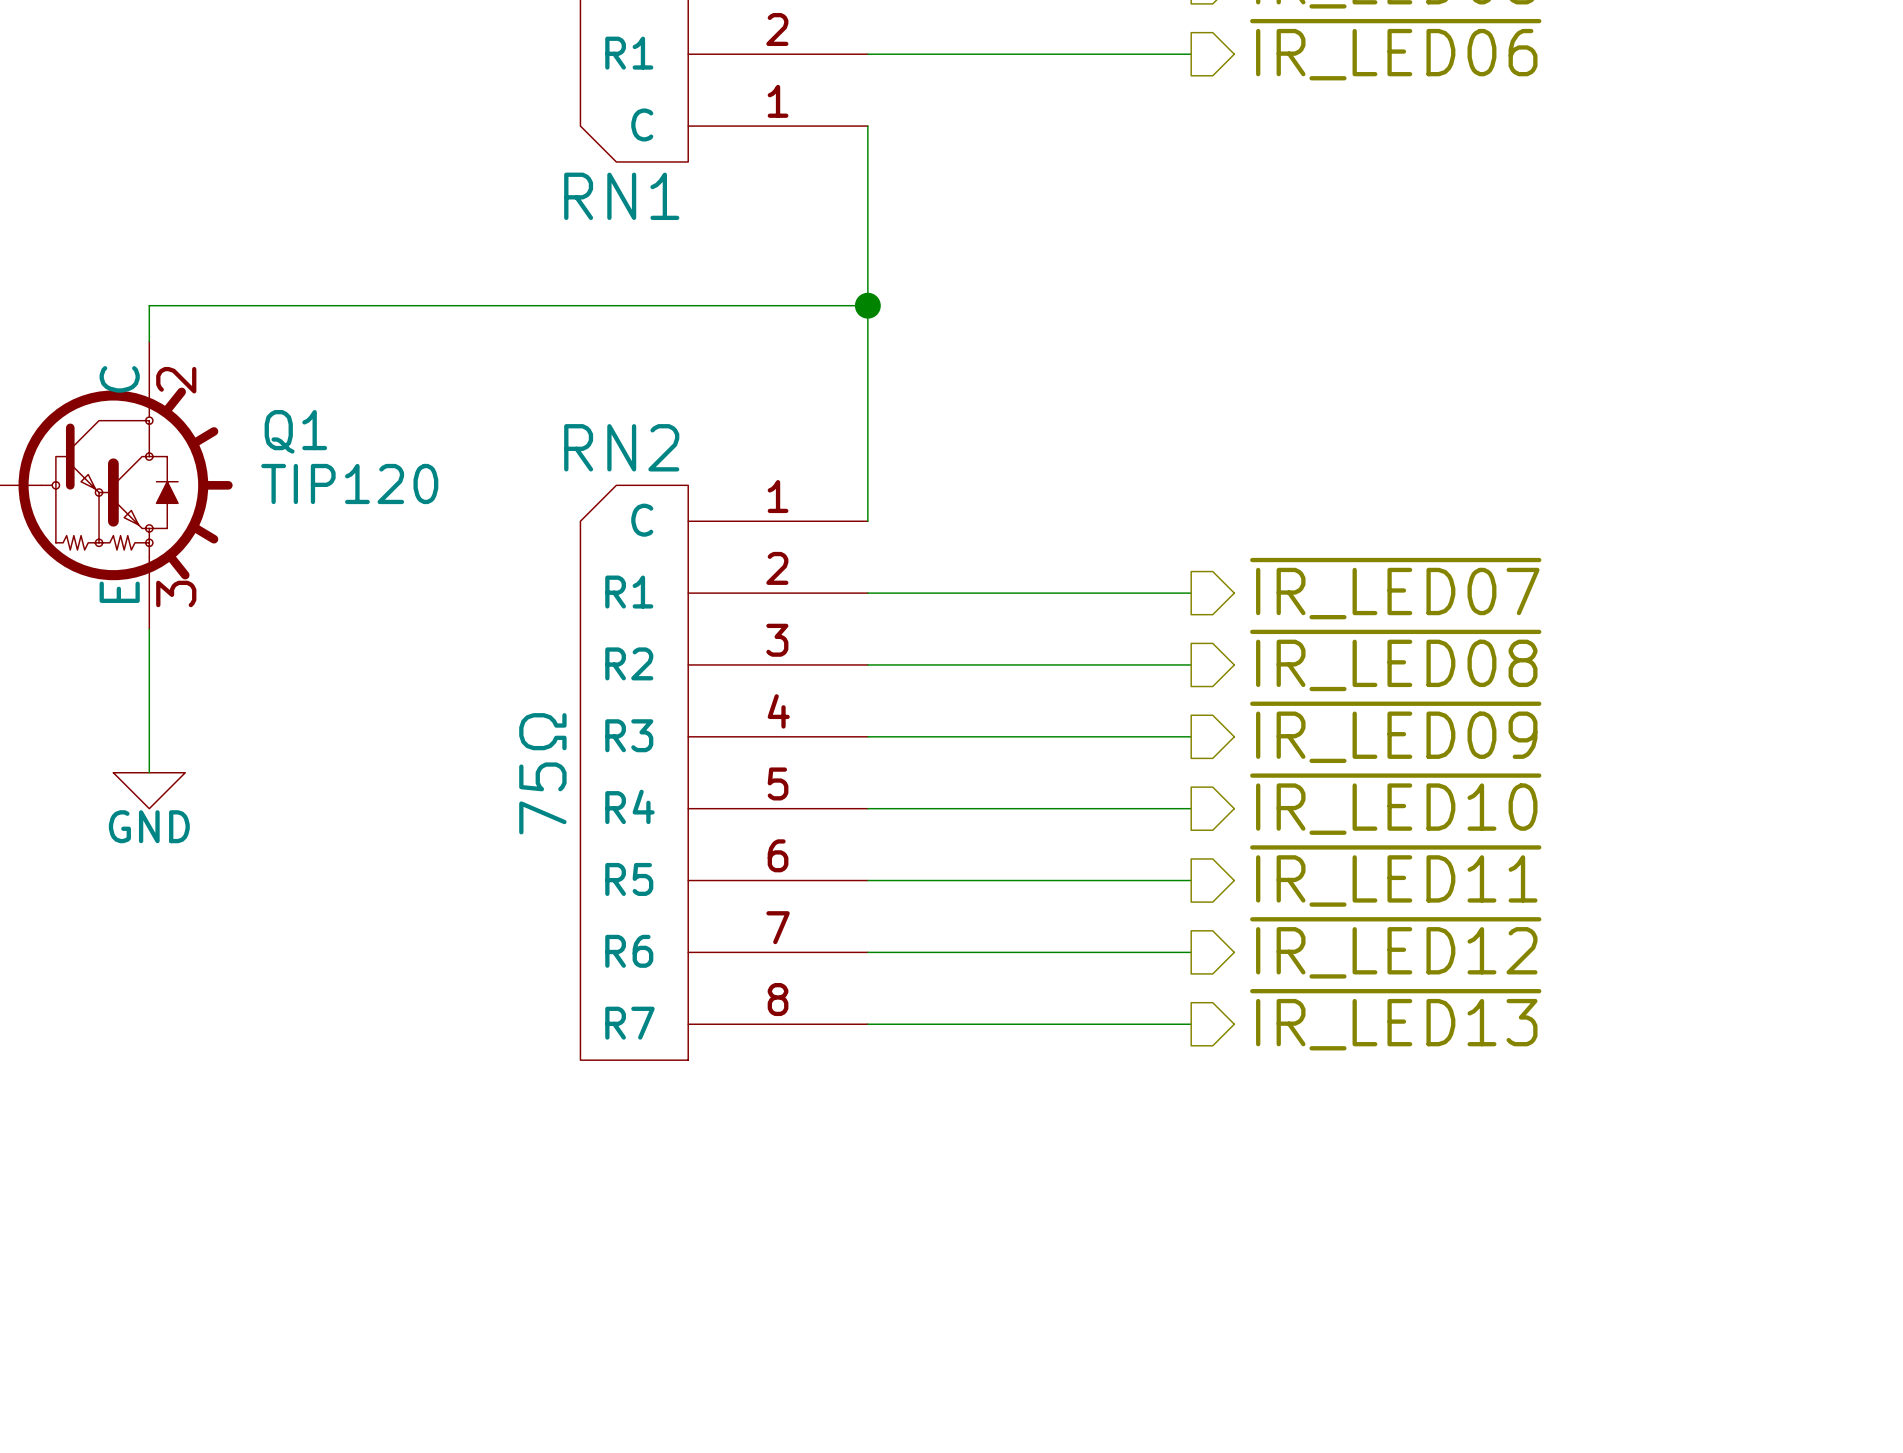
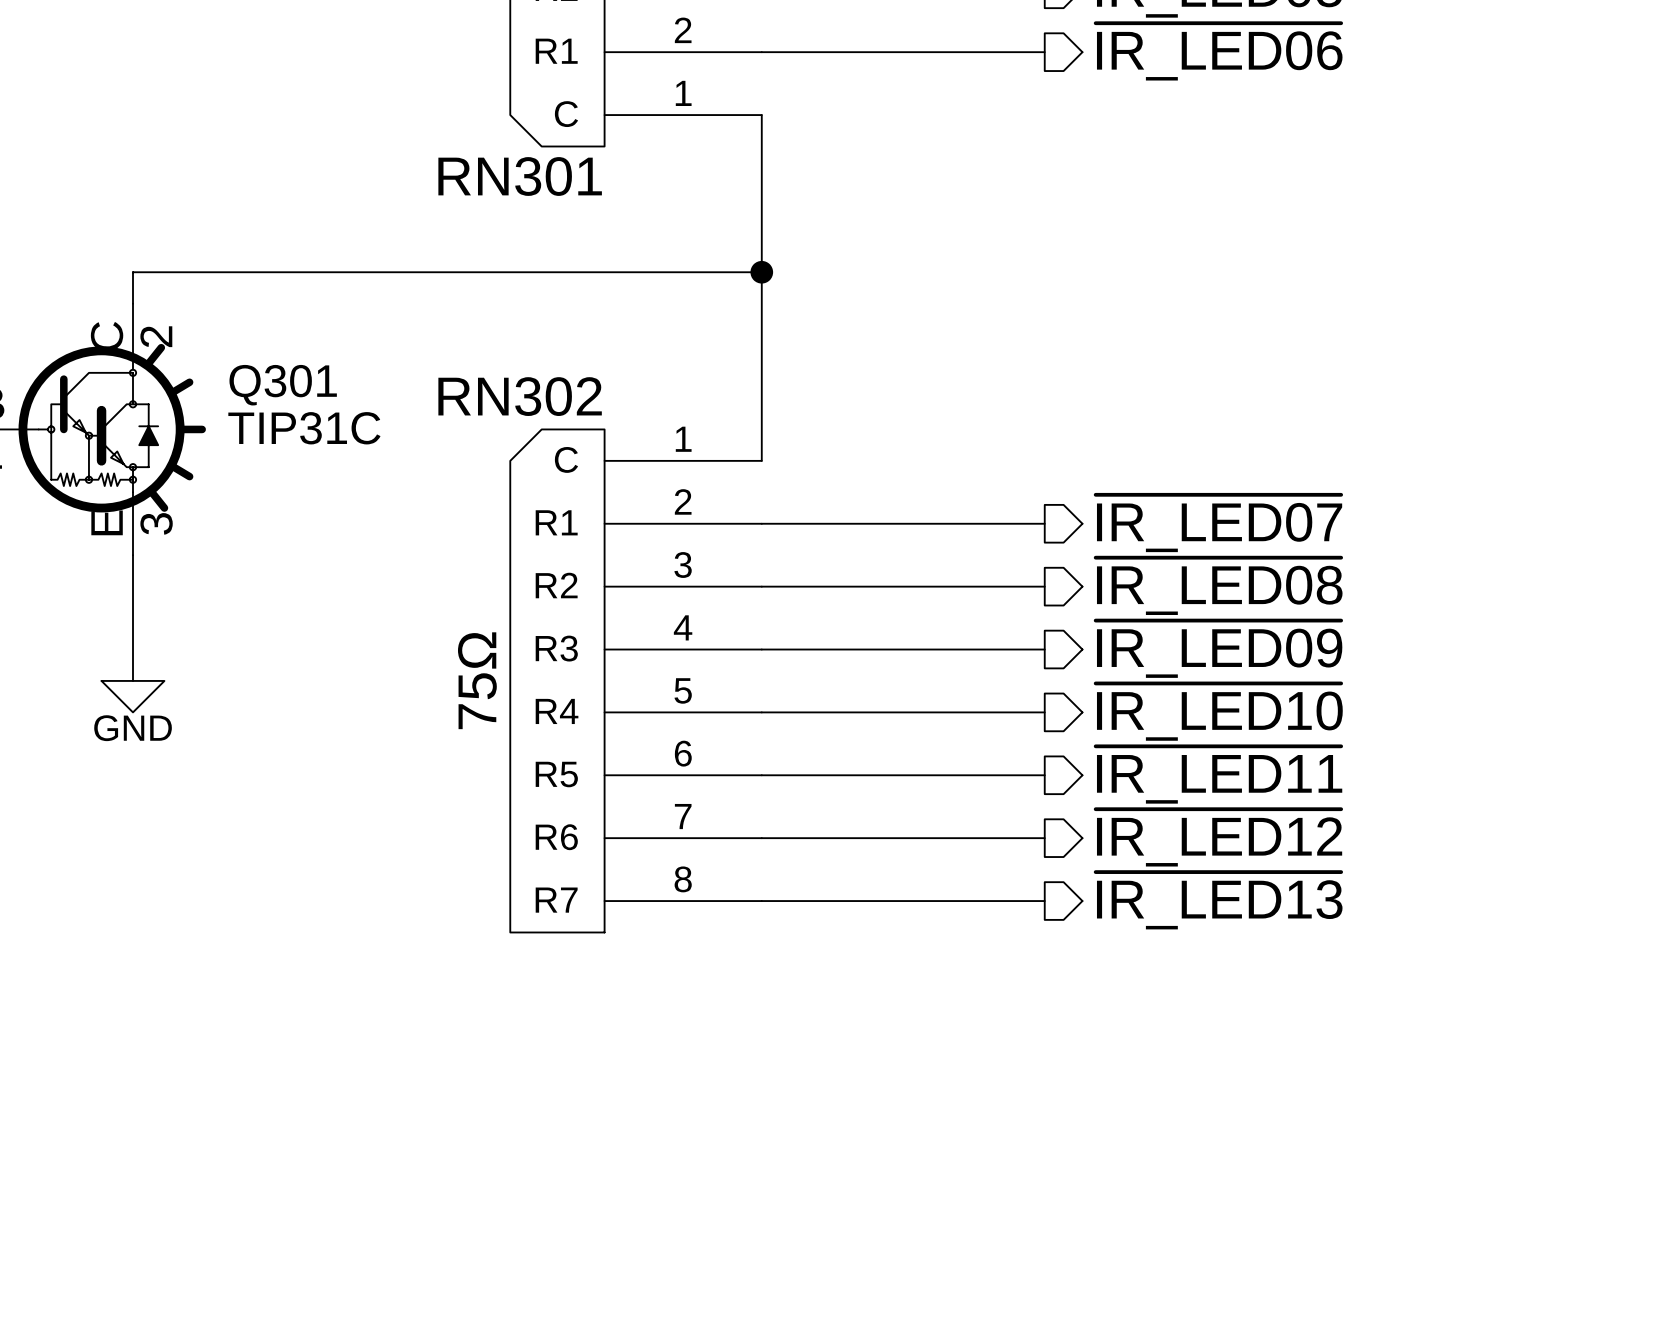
RN1 name: RN1 (621, 196) -> RN301 (520, 176)
Q1 name: Q1 (295, 431) -> Q301 (283, 385)
RN2 name: RN2 (621, 447) -> RN302 (520, 396)
Q1 value: TIP120 (349, 483) -> TIP31C (304, 428)

